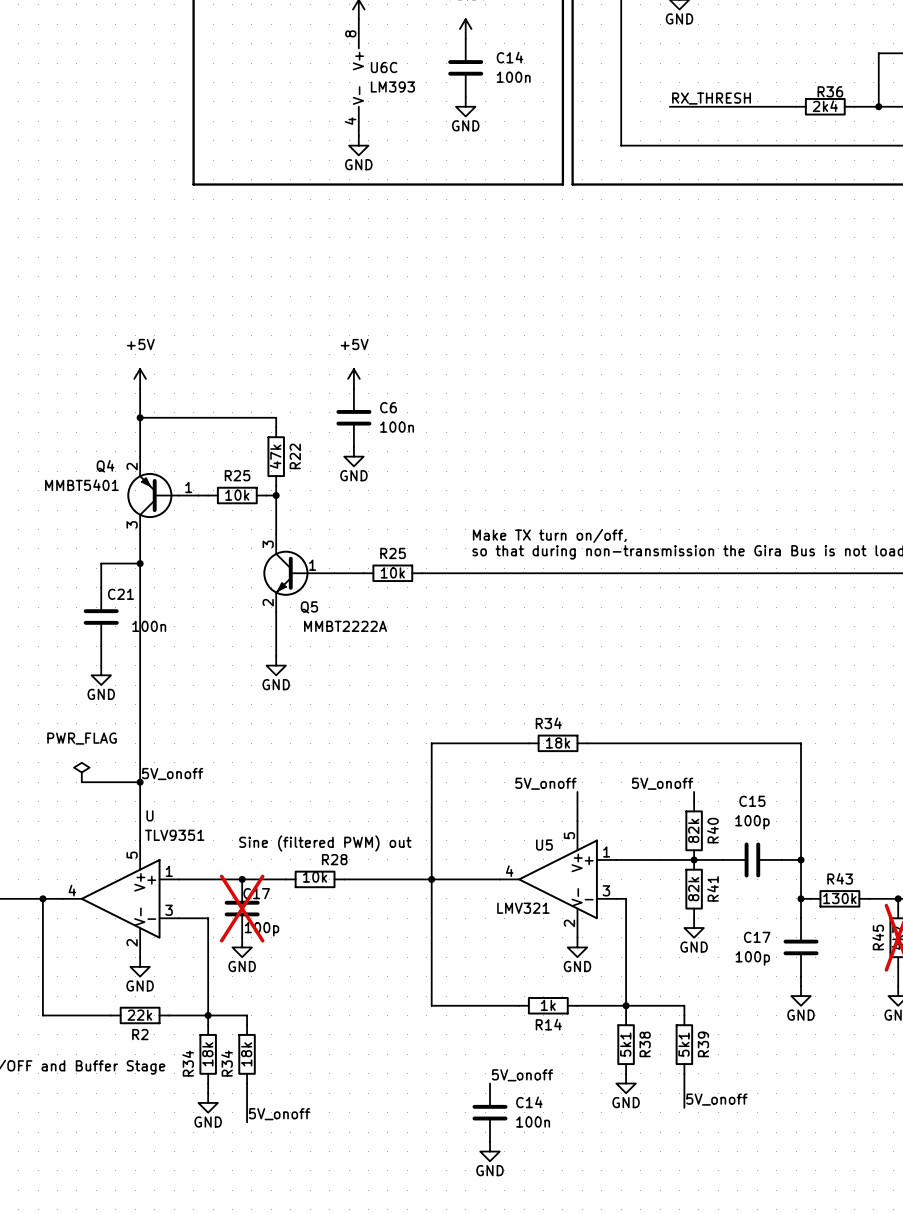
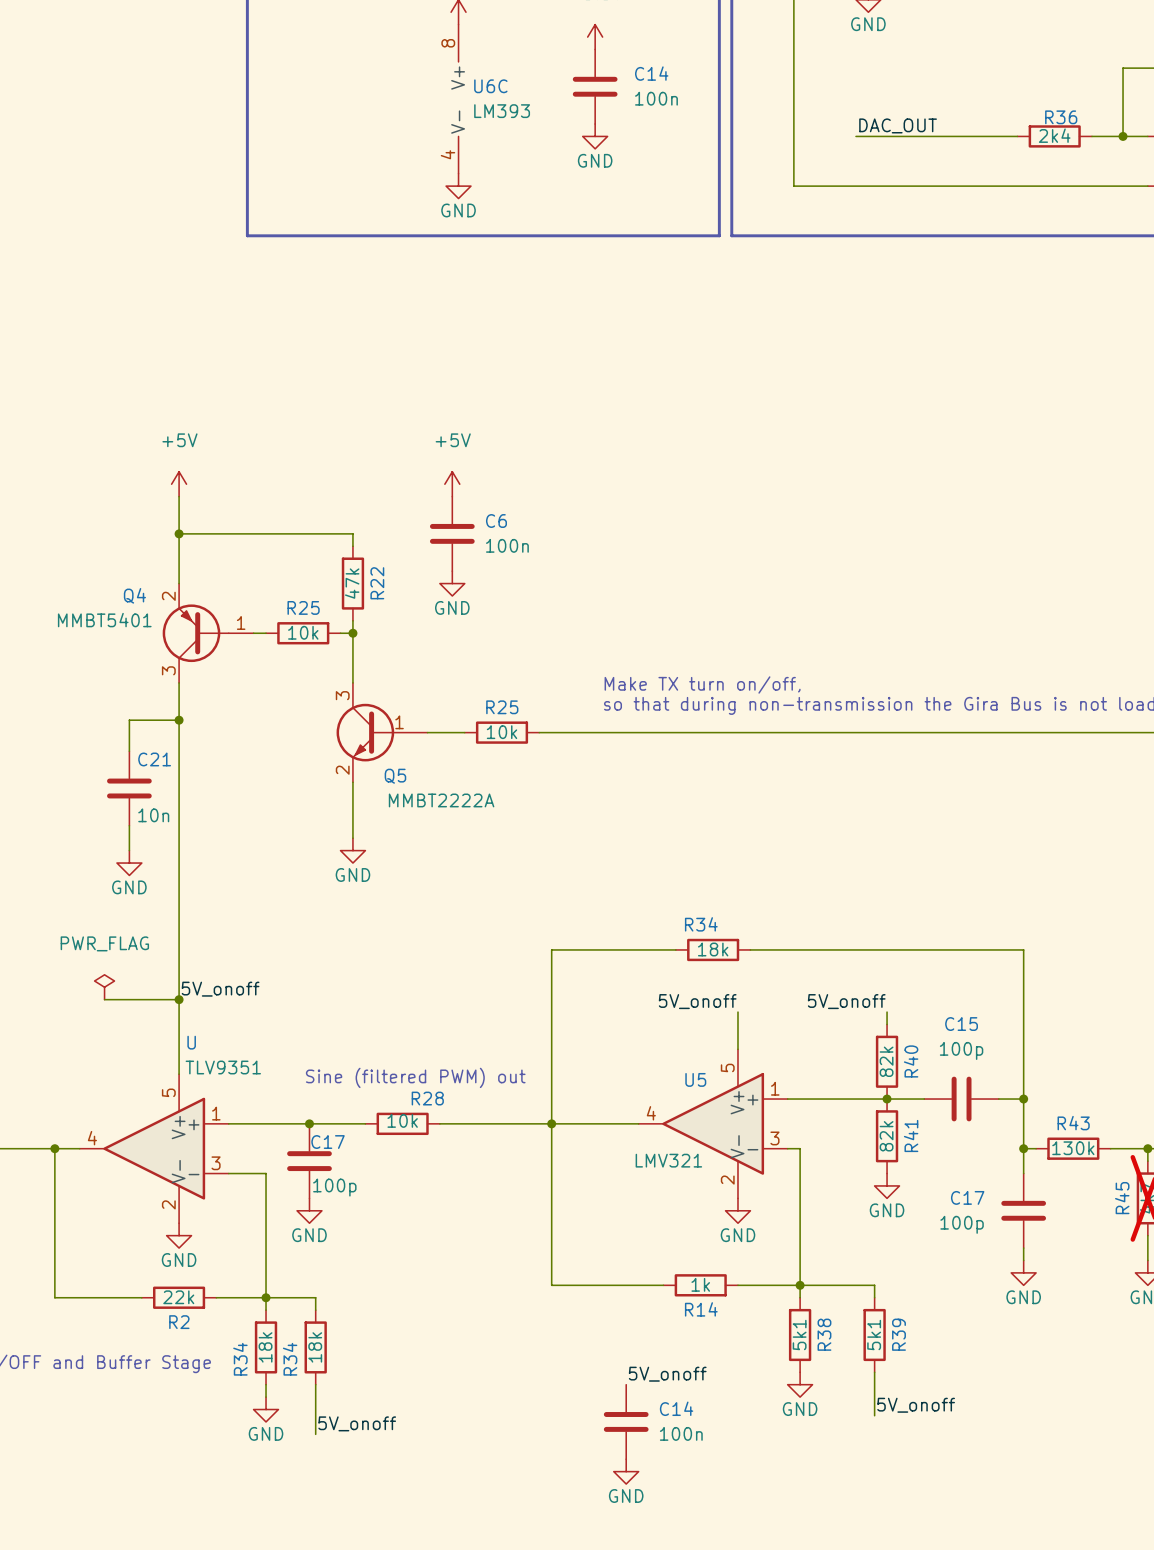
label: RX_THRESH (711, 98) -> DAC_OUT (898, 125)
C21 value: 100n (149, 626) -> 10n (153, 815)
C17 do-not-place cross: (242, 908) -> none

